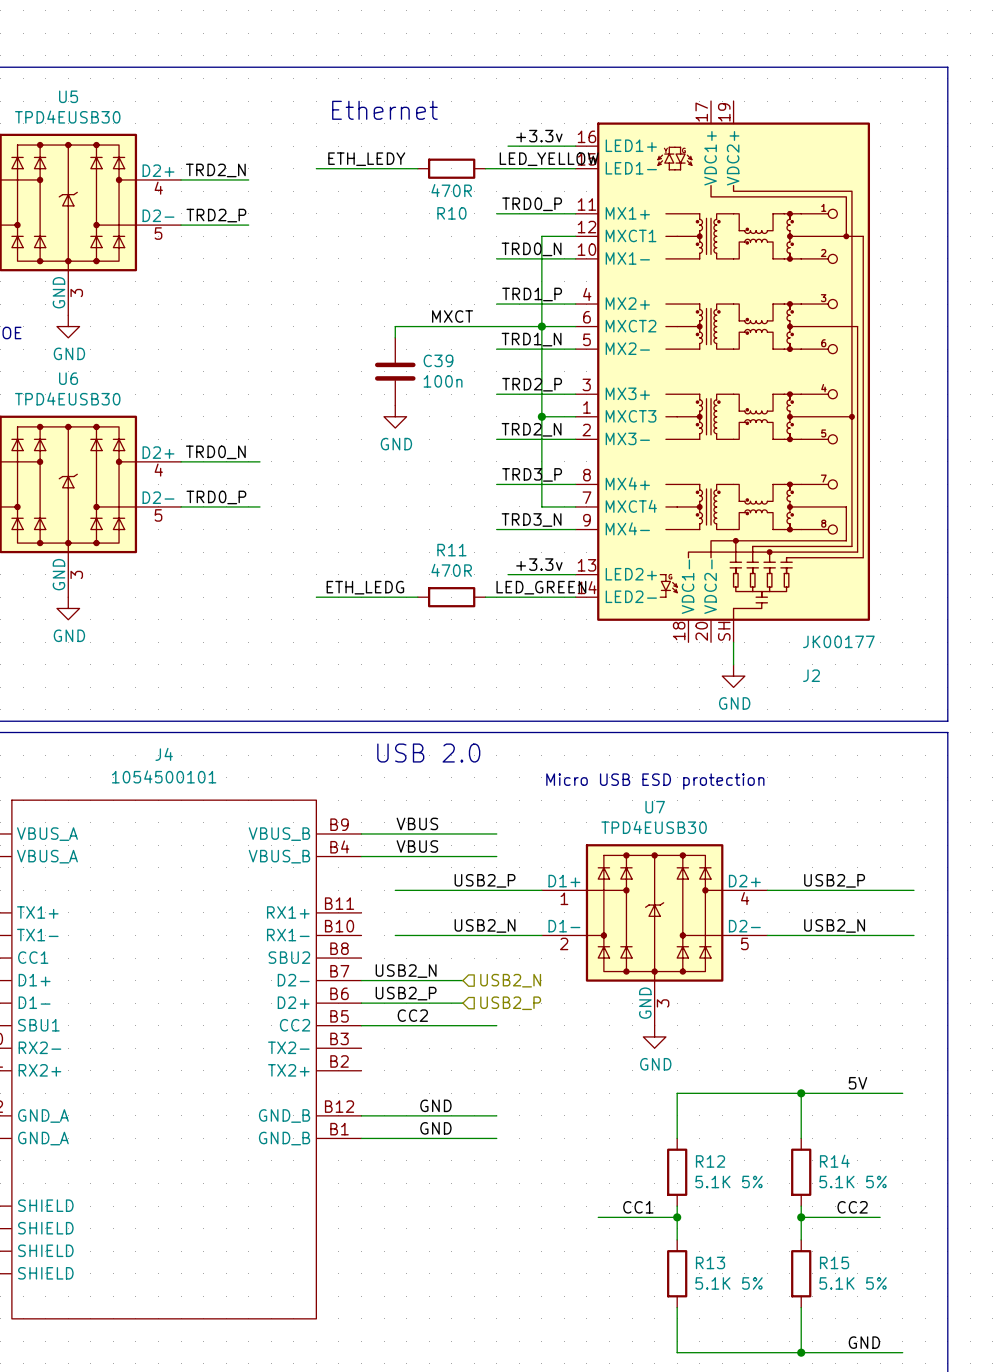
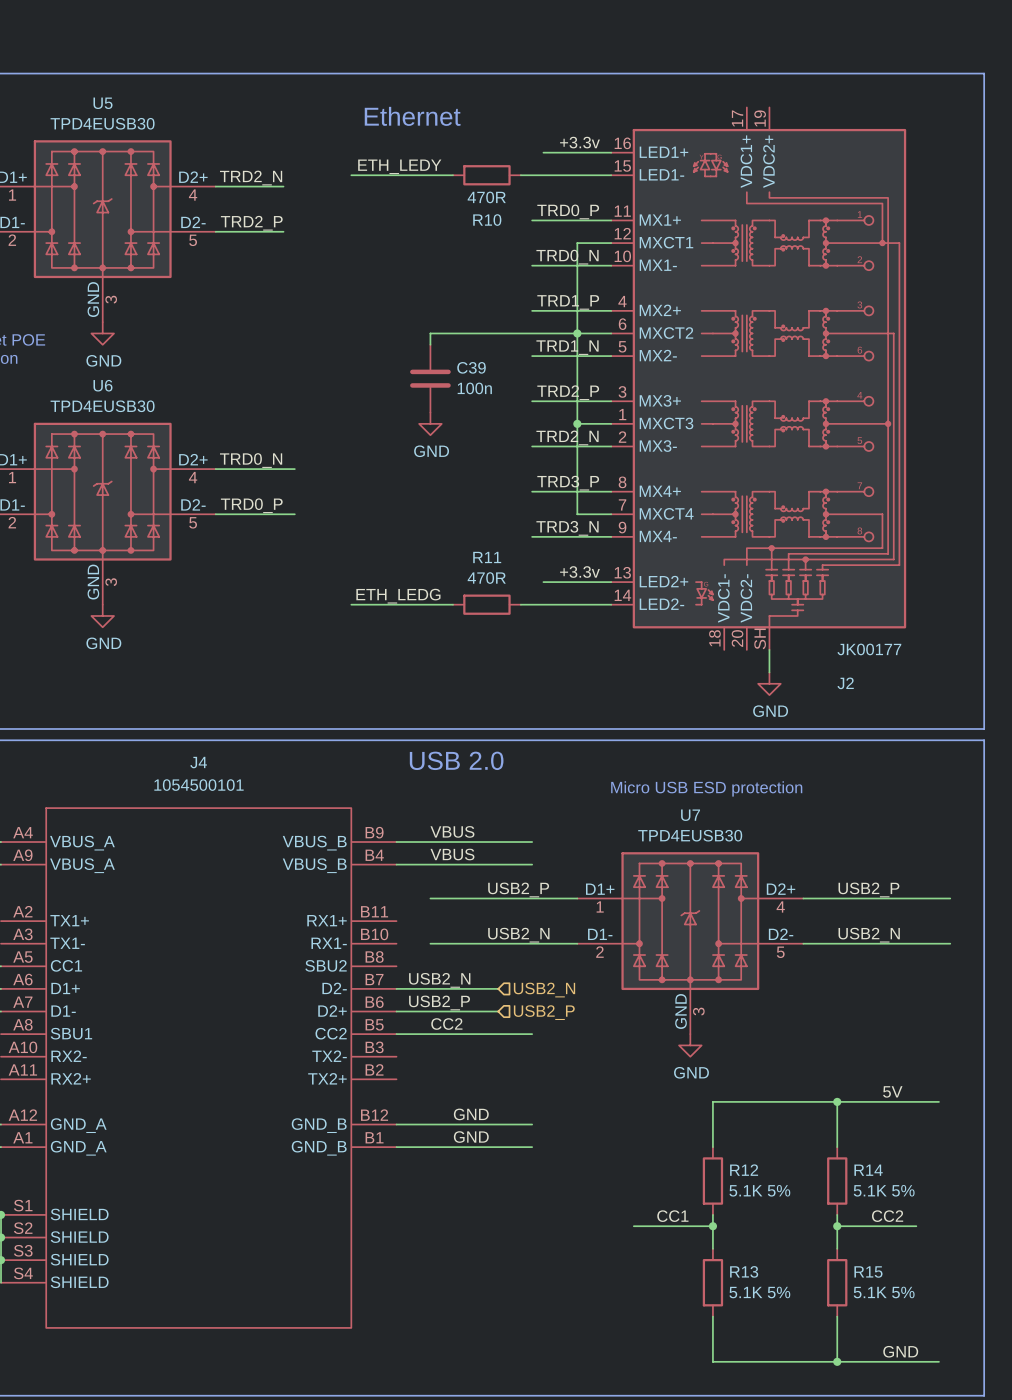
label: LED_YELLOW (549, 159) -> none
label: MXCT (452, 316) -> none
label: LED_GREEN (541, 587) -> none

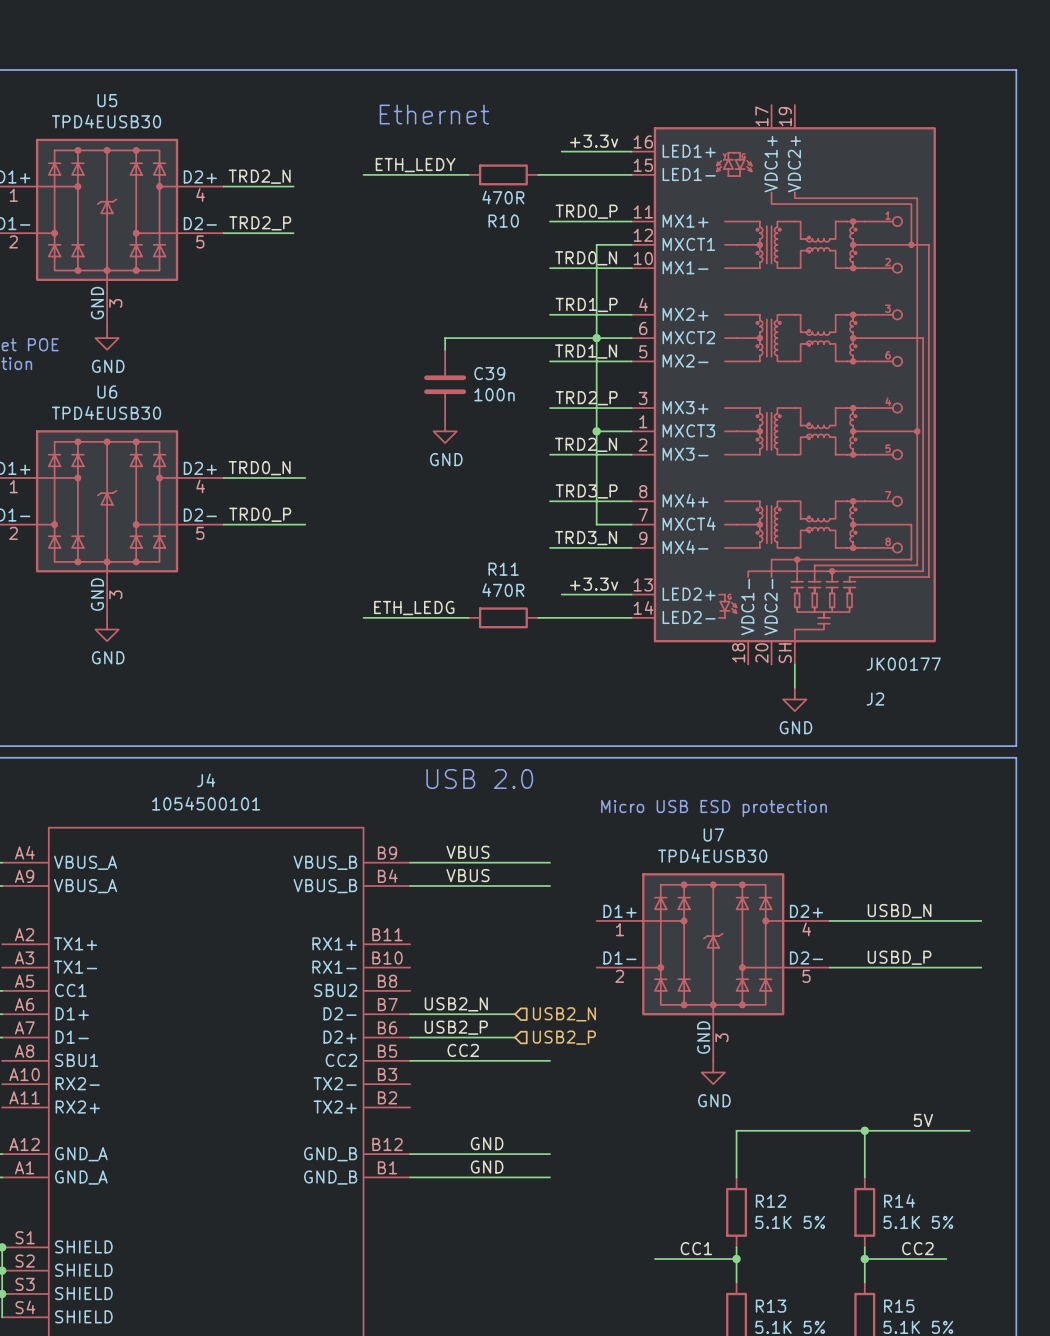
label: USB2_P (518, 889) -> none
label: USB2_P (868, 889) -> USBD_N (899, 911)
wire: (430, 898) (577, 898) -> none
label: USB2_N (518, 935) -> none
label: USB2_N (869, 935) -> USBD_P (899, 957)
wire: (430, 943) (577, 943) -> none

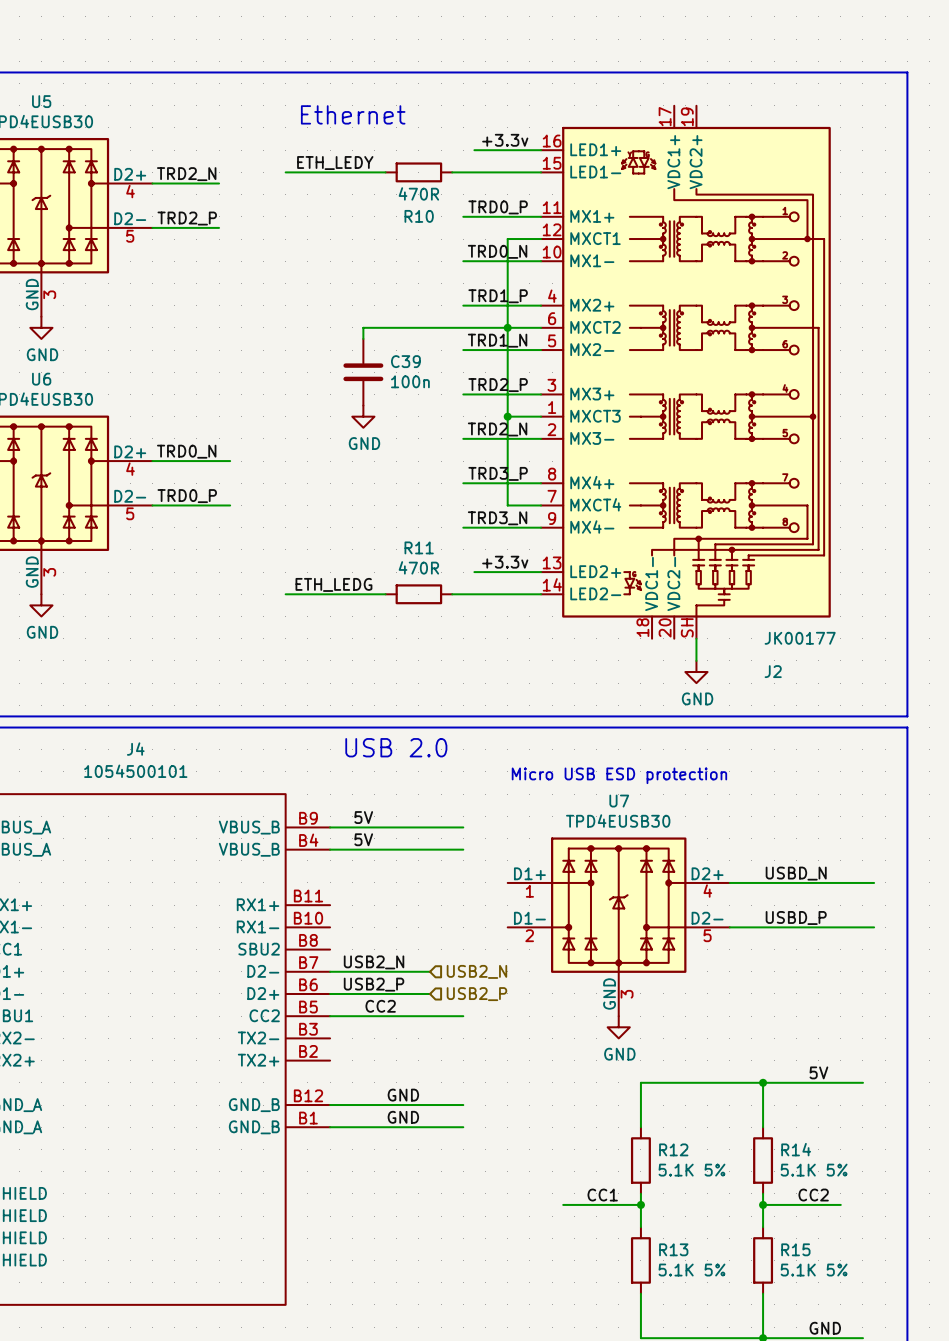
label: none -> 5V (363, 817)
label: VBUS (467, 852) -> none
label: none -> 5V (363, 839)
label: VBUS (467, 875) -> none

